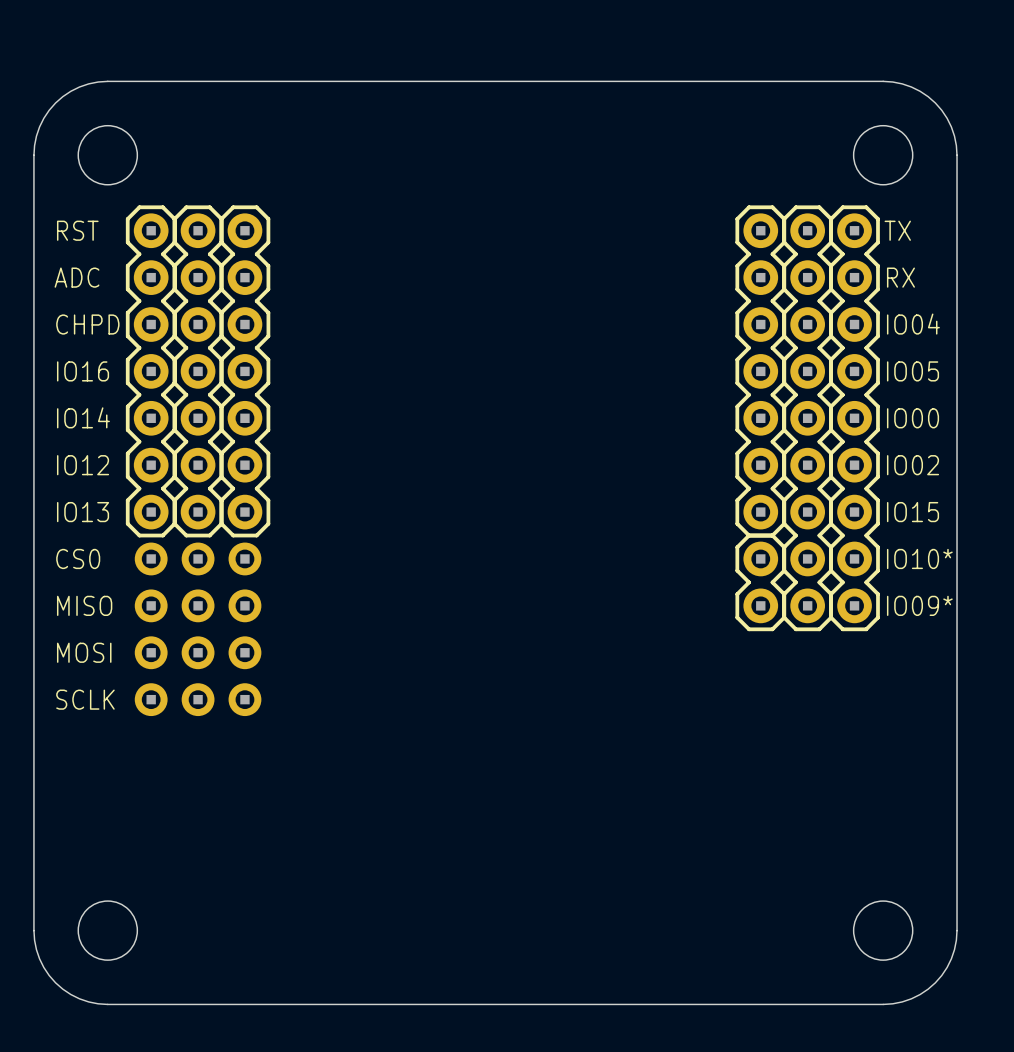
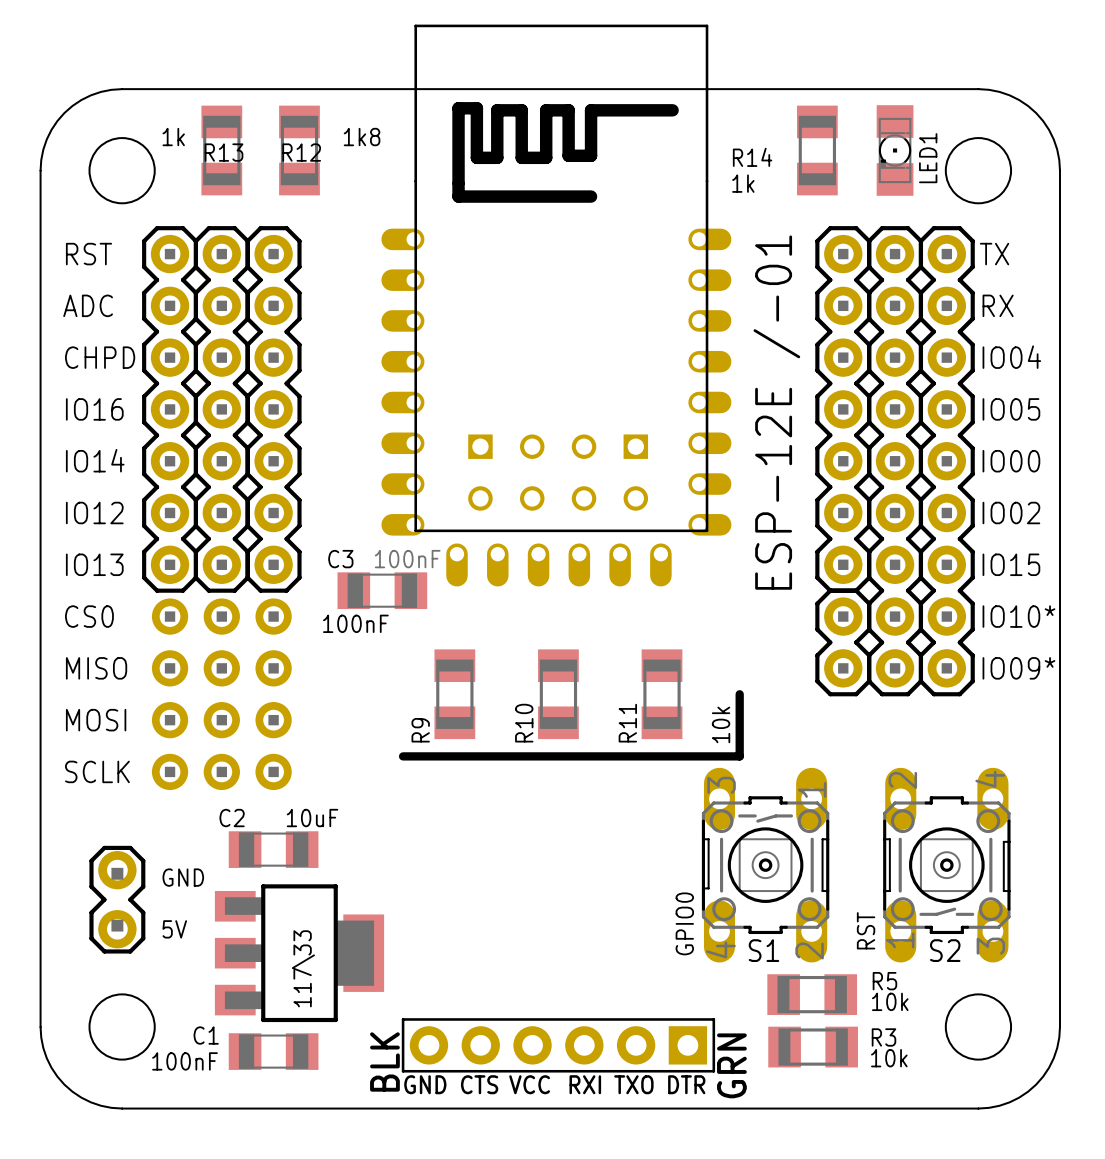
R13: none -> 1k (221, 150)
R12: none -> 1k8 (299, 150)
R14: none -> 1k (817, 150)
LED1: none -> (895, 150)
part: none -> (561, 278)
part: none -> ESP-12E /-01 (556, 344)
C3: none -> 100nF (382, 590)
text: none -> 100nF (355, 623)
R9: none -> (454, 694)
R10: none -> (558, 694)
R11: none -> 10k (662, 694)
line: none -> (739, 694) (739, 756) (403, 756)
C2: none -> 10uF (273, 849)
S1: none -> GPIO0 (765, 865)
S2: none -> RST (946, 865)
text: none -> GND (183, 877)
part: none -> (117, 899)
text: none -> 5V (174, 929)
part: none -> 117\33 (299, 953)
R5: none -> 10k (812, 994)
part: none -> (558, 1045)
R3: none -> 10k (813, 1047)
C1: none -> 100nF (273, 1051)

